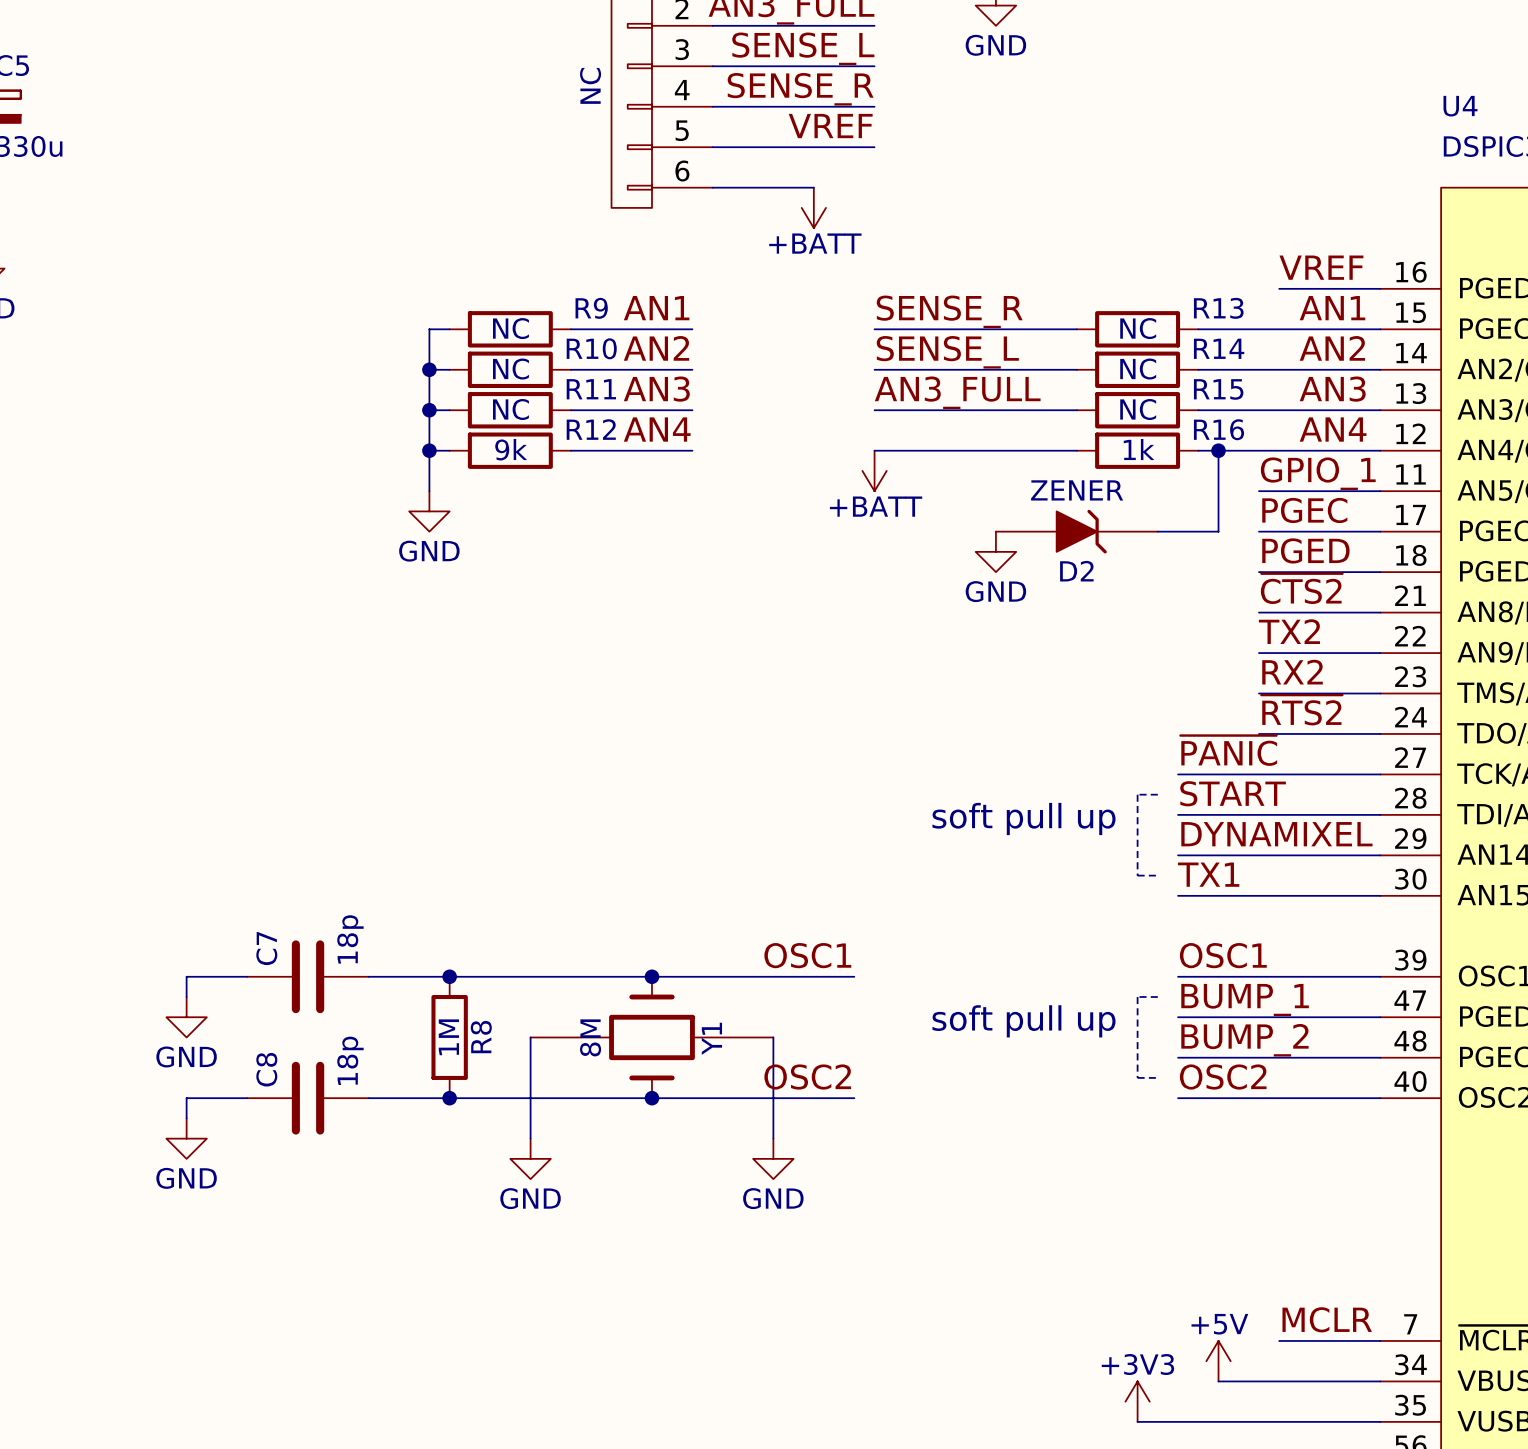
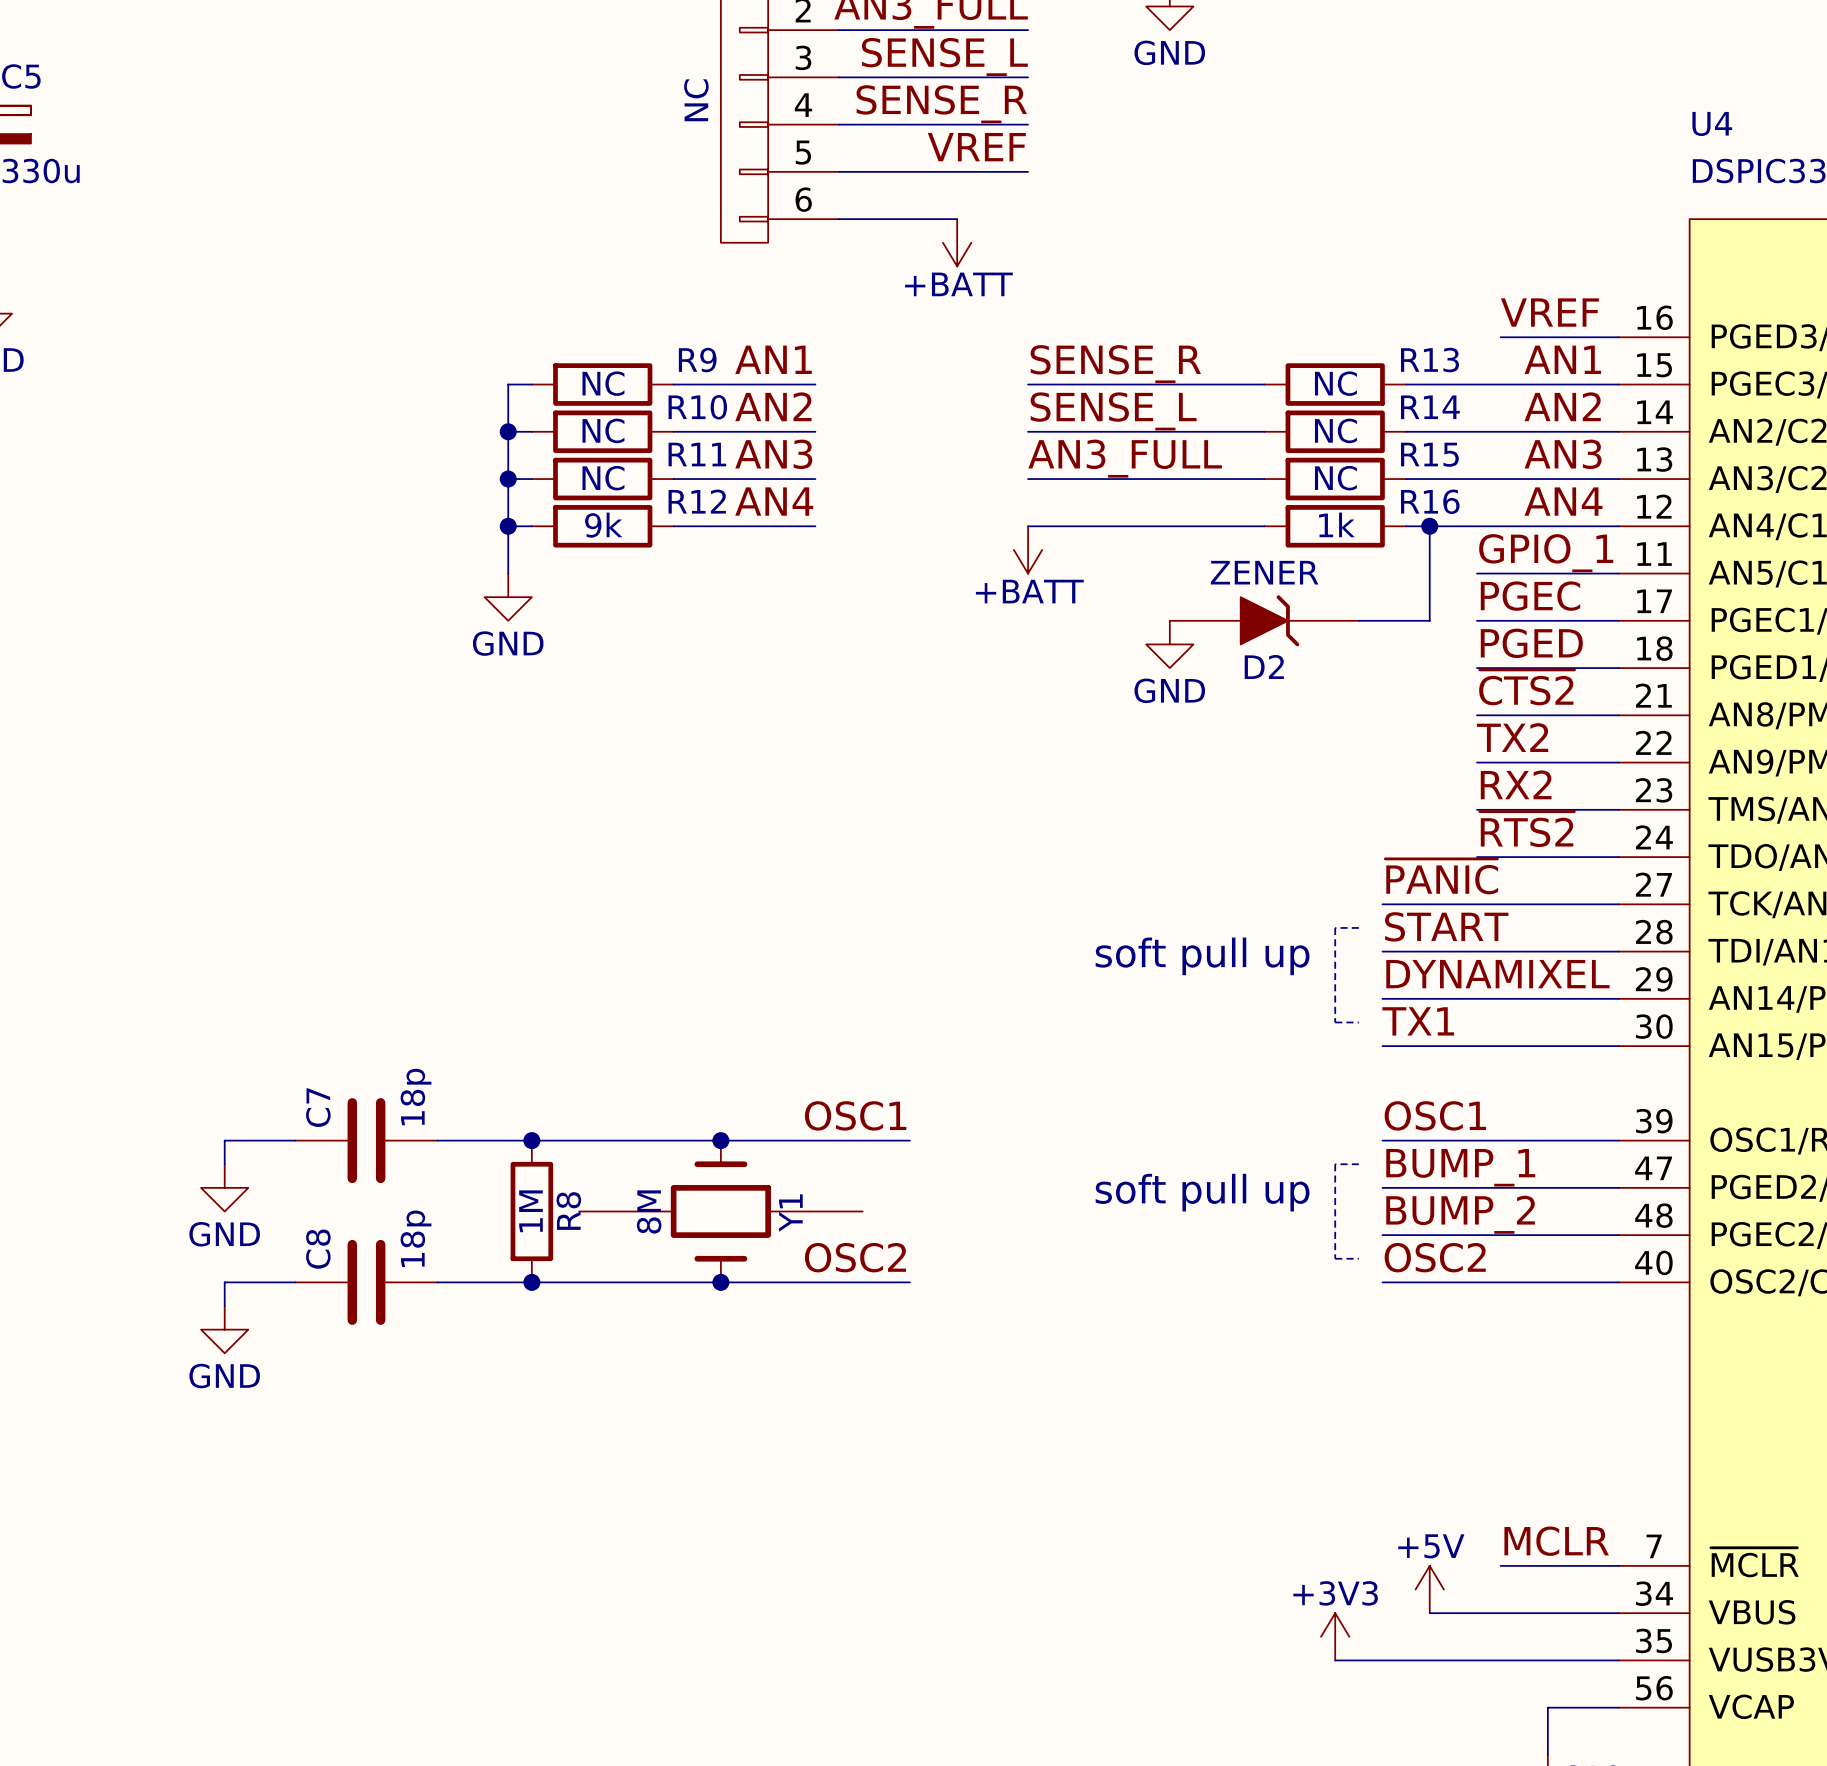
label position: OSC1 (807, 955) -> OSC1 (855, 1115)
junction position: (651, 976) -> (720, 1140)
wire: (773, 976) (854, 976) -> none
wire: (530, 1037) (530, 1138) -> none
Y1 position: (651, 1037) -> (720, 1211)
wire: (773, 1037) (773, 1138) -> none
label position: OSC2 (807, 1077) -> OSC2 (855, 1257)
junction position: (651, 1098) -> (720, 1282)
wire: (773, 1098) (854, 1098) -> none
power symbol: GND (530, 1158) -> none
power symbol: GND (773, 1158) -> none

